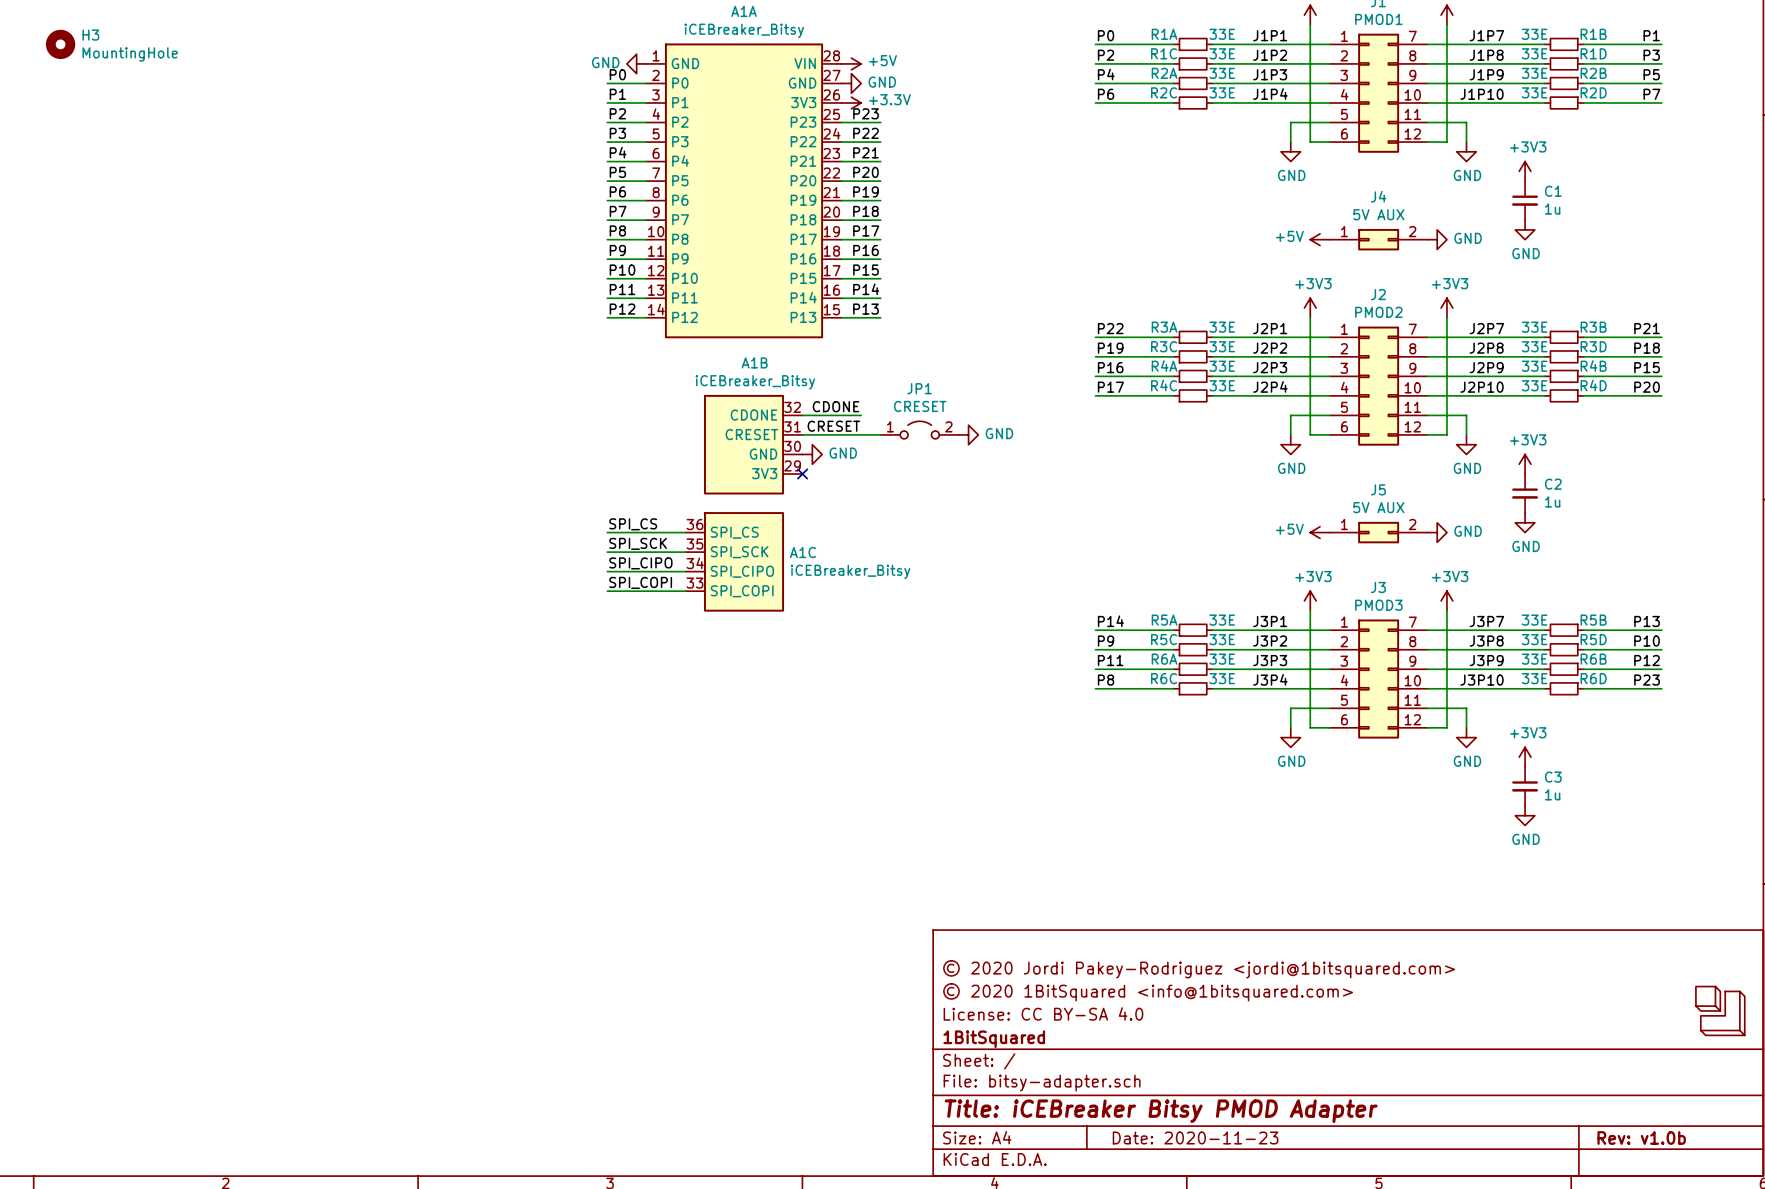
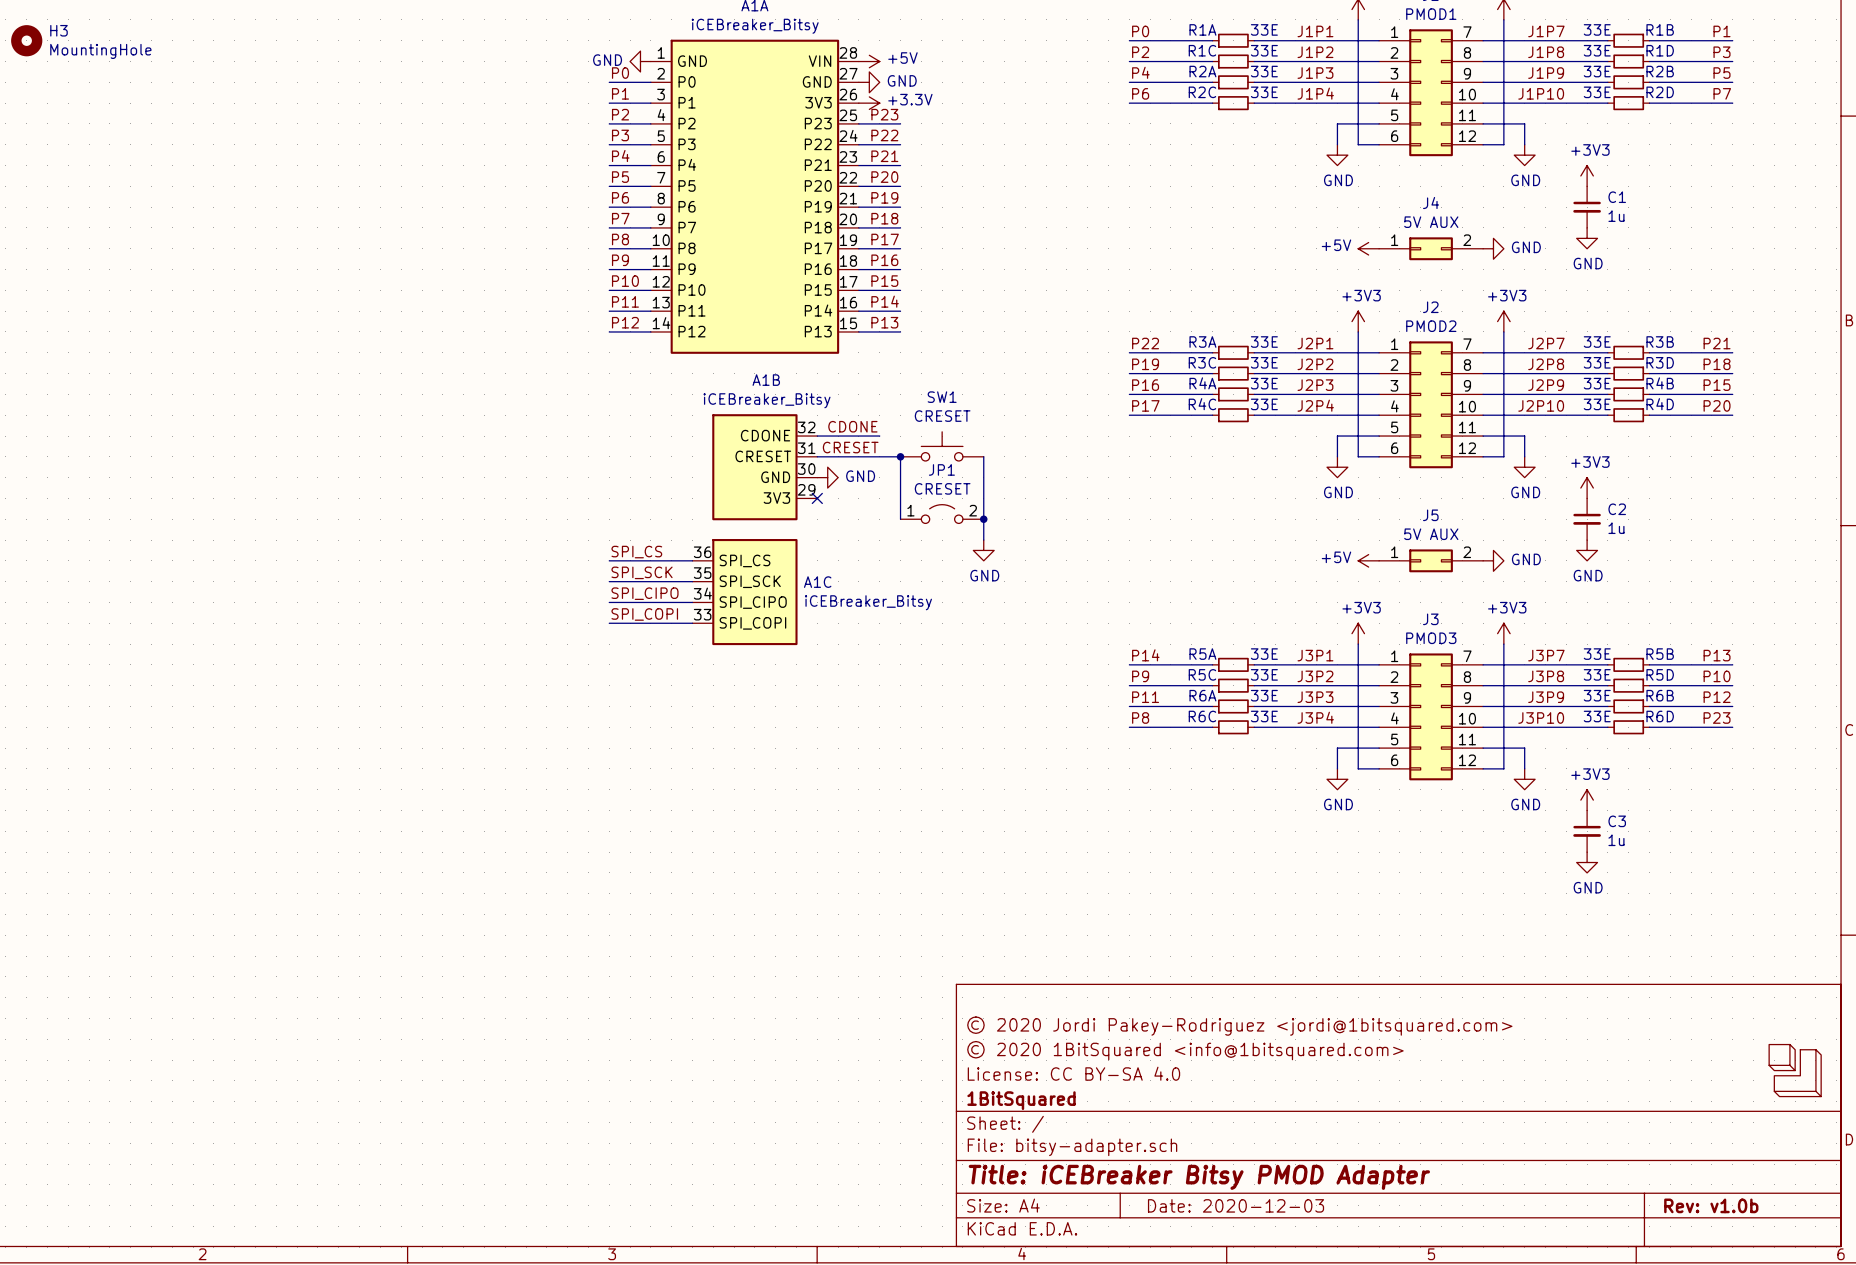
SW1: none -> CRESET (942, 446)
JP1 position: (919, 430) -> (942, 514)
wire: none -> (900, 456) (900, 519)
junction: none -> (900, 456)
wire: none -> (983, 456) (983, 540)
power symbol rotation: 0° (968, 434) -> 90° clockwise (983, 550)
power symbol position: GND (968, 434) -> GND (983, 550)
junction: none -> (983, 519)
title block: Date: 2020-11-23 (1195, 1137) -> Date: 2020-12-03 (1236, 1205)

